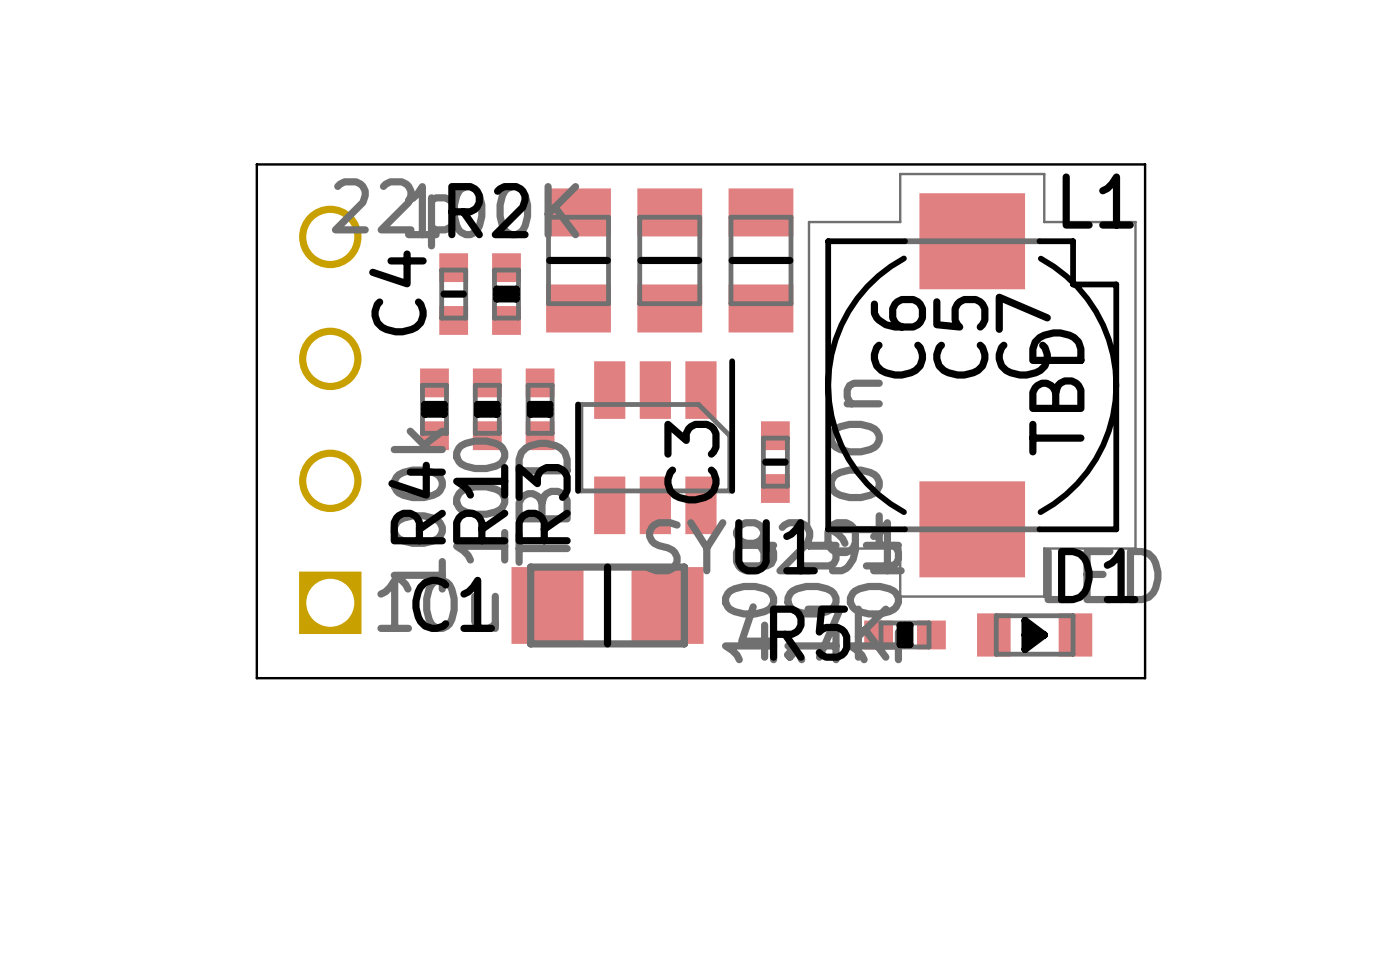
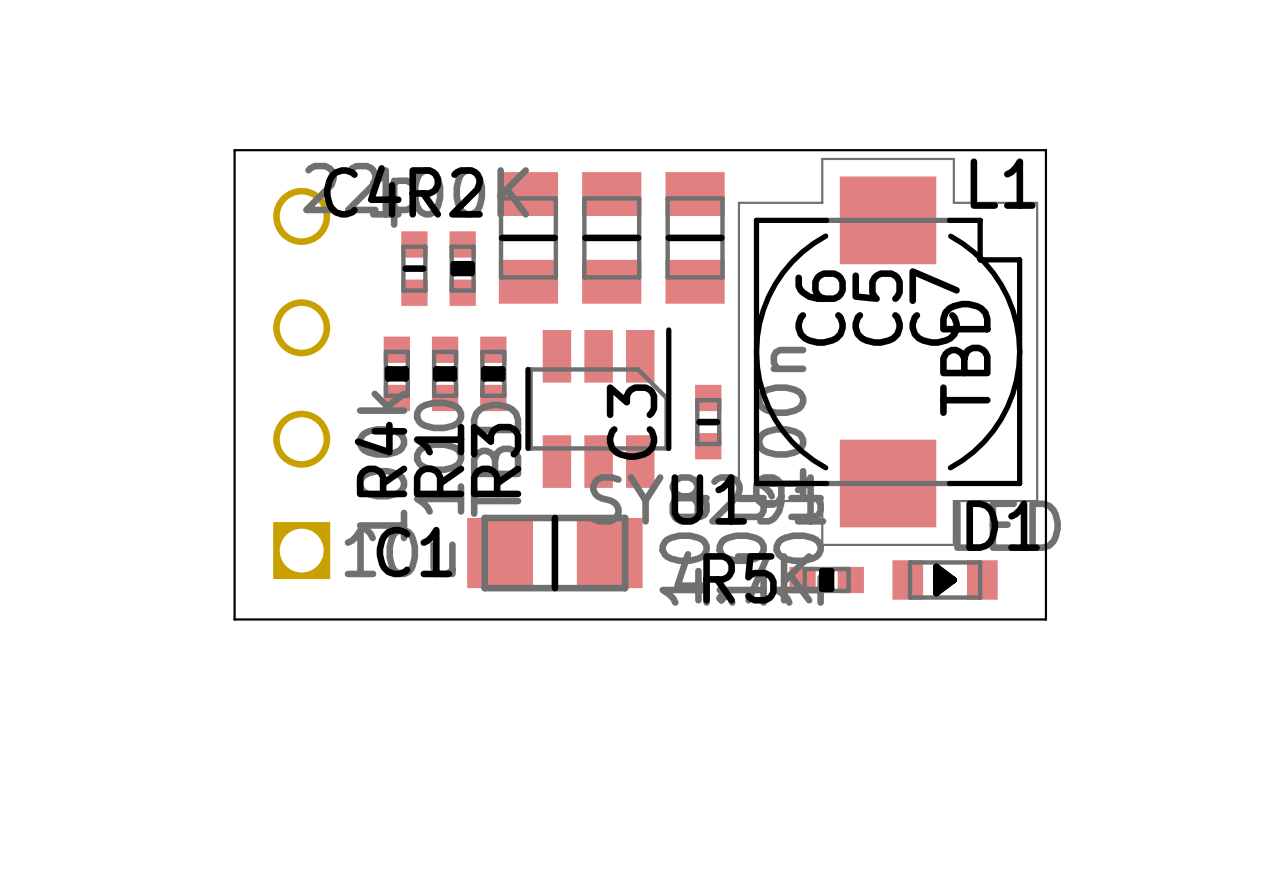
C4 name rotation: 0° (397, 292) -> 90° clockwise (362, 191)

